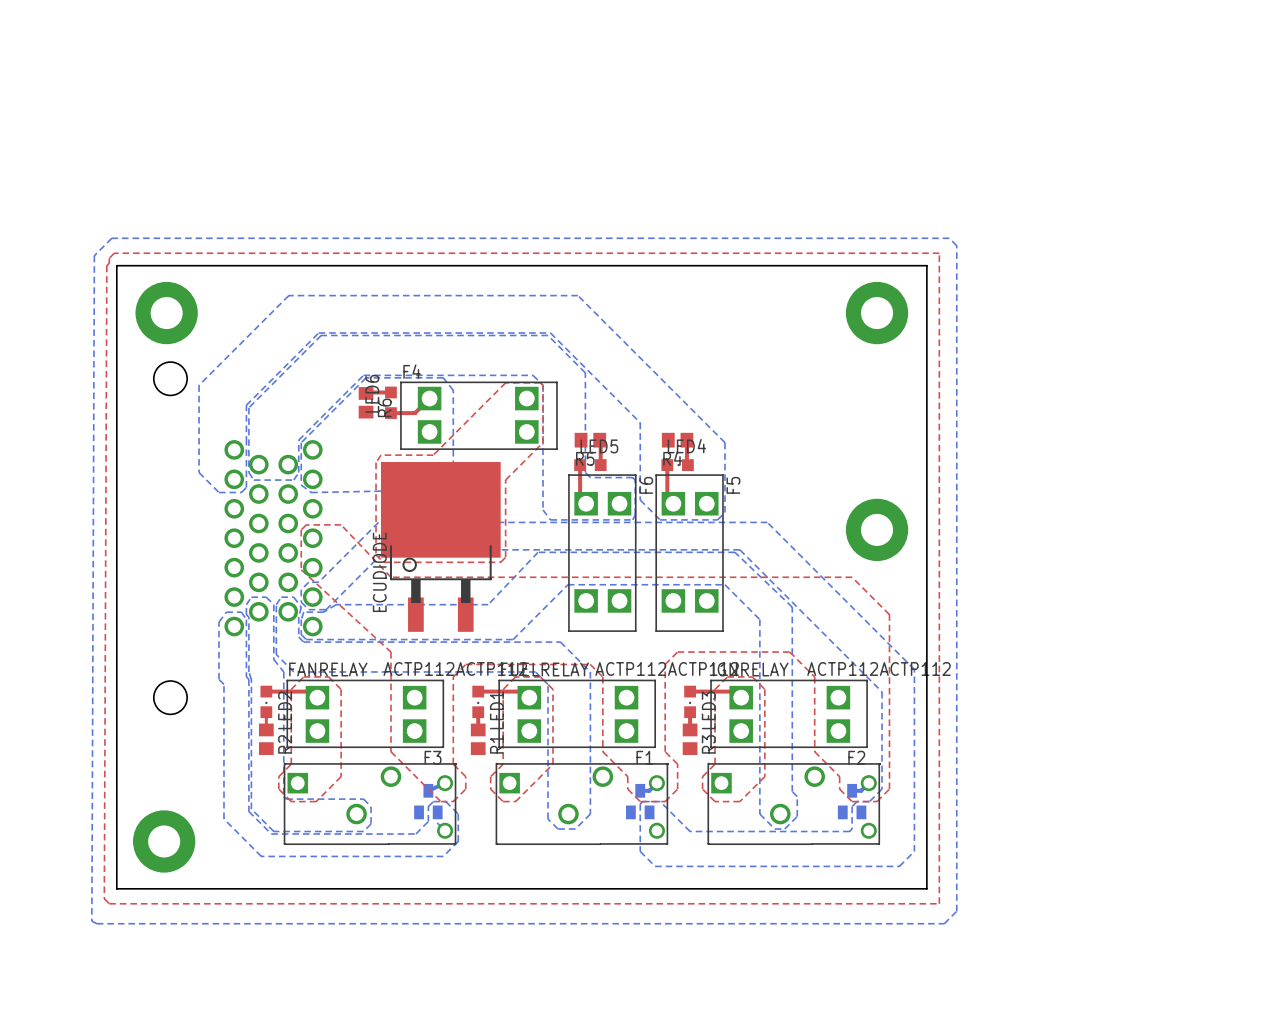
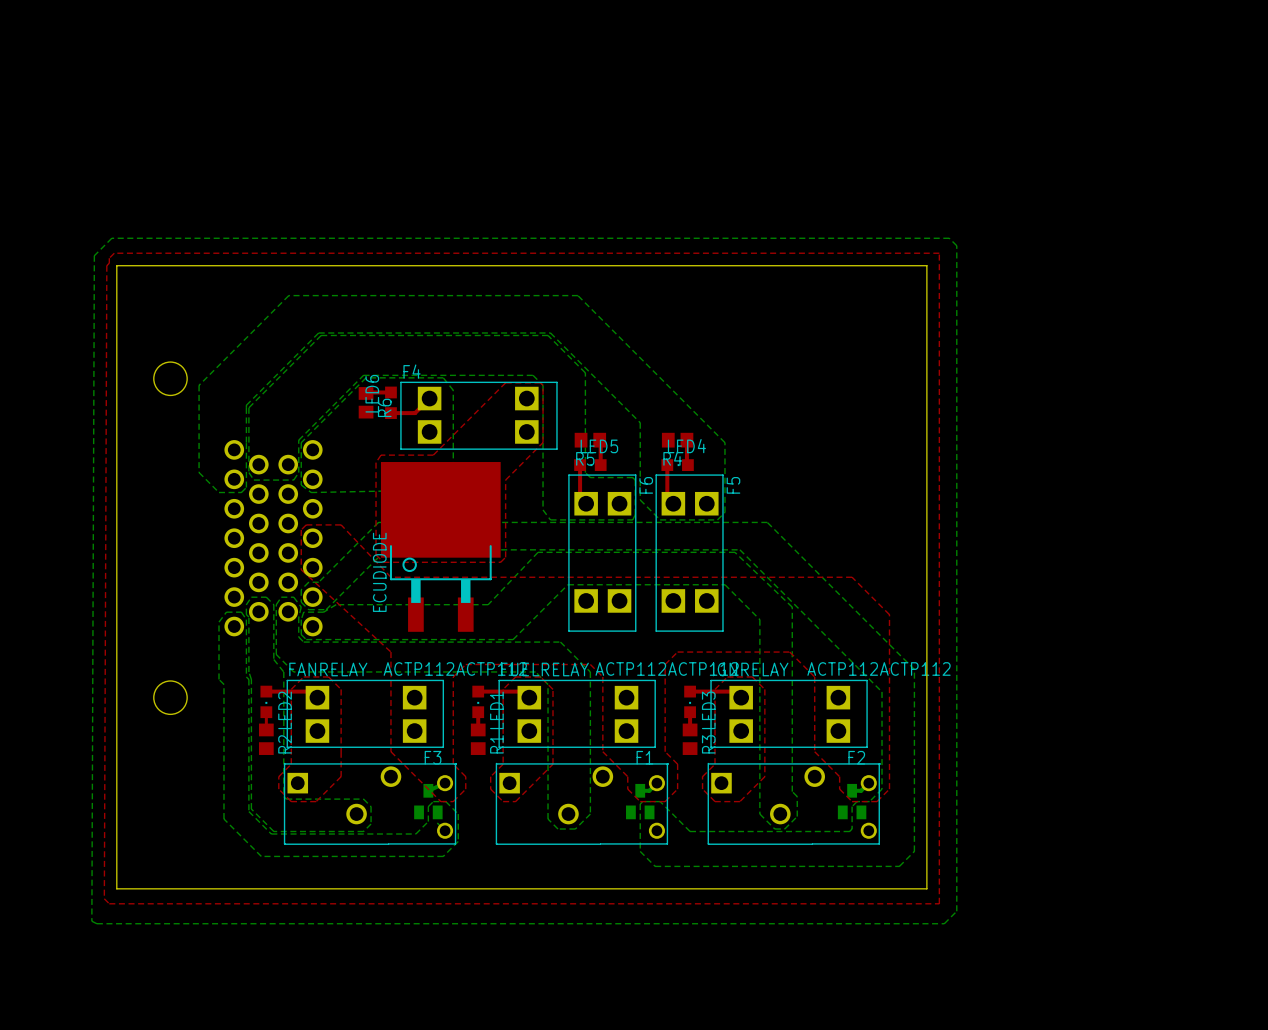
part: (166, 313) -> none
part: (877, 313) -> none
part: (877, 529) -> none
part: (164, 841) -> none

